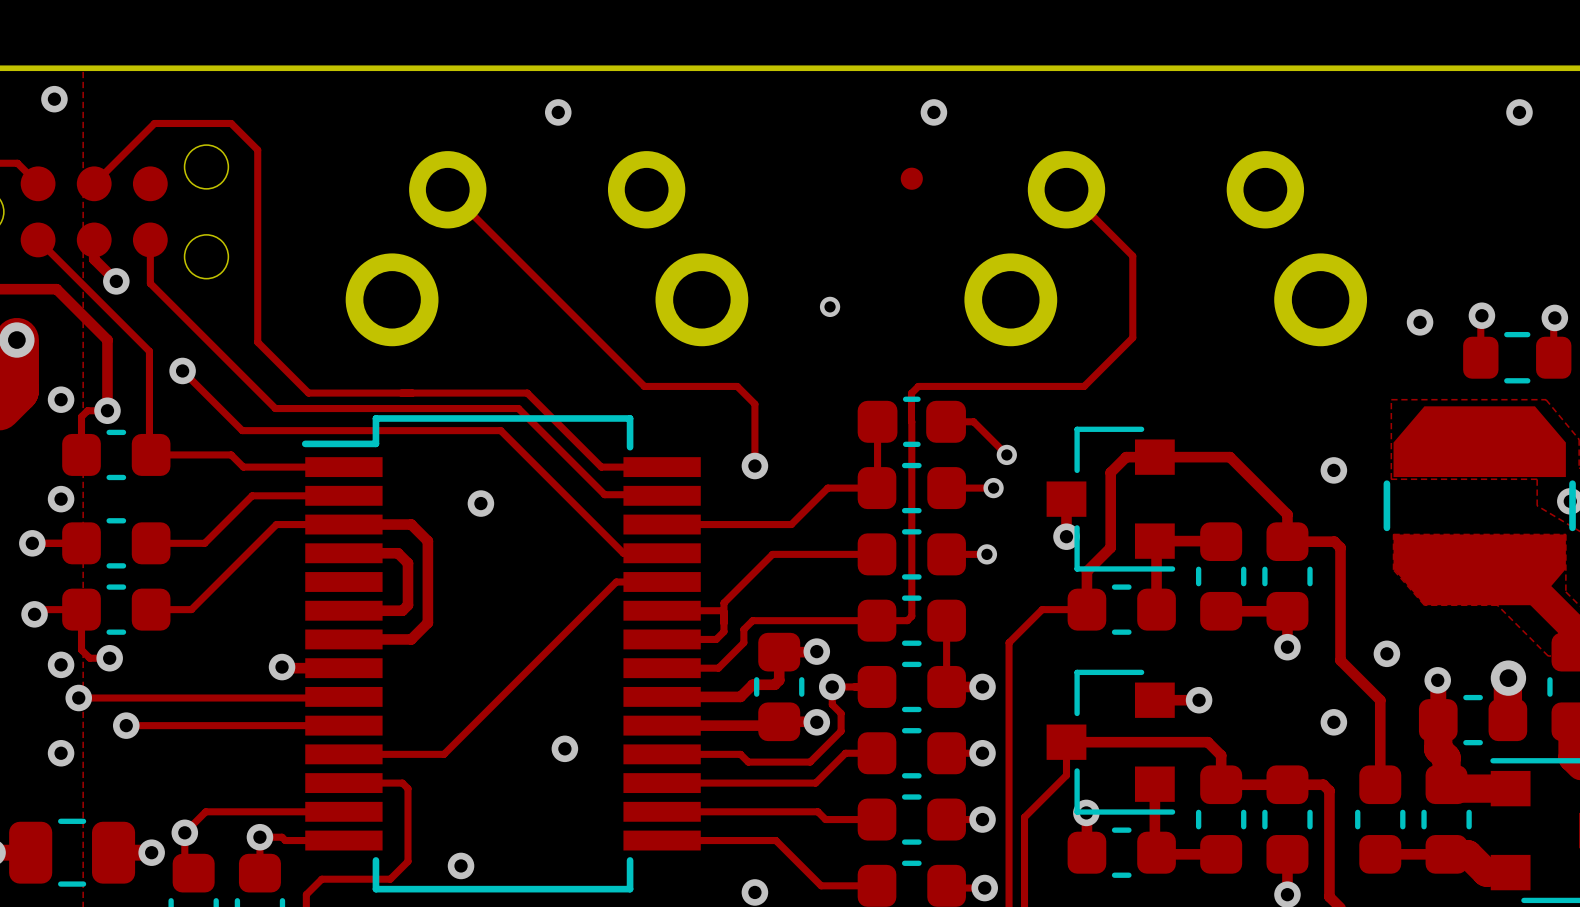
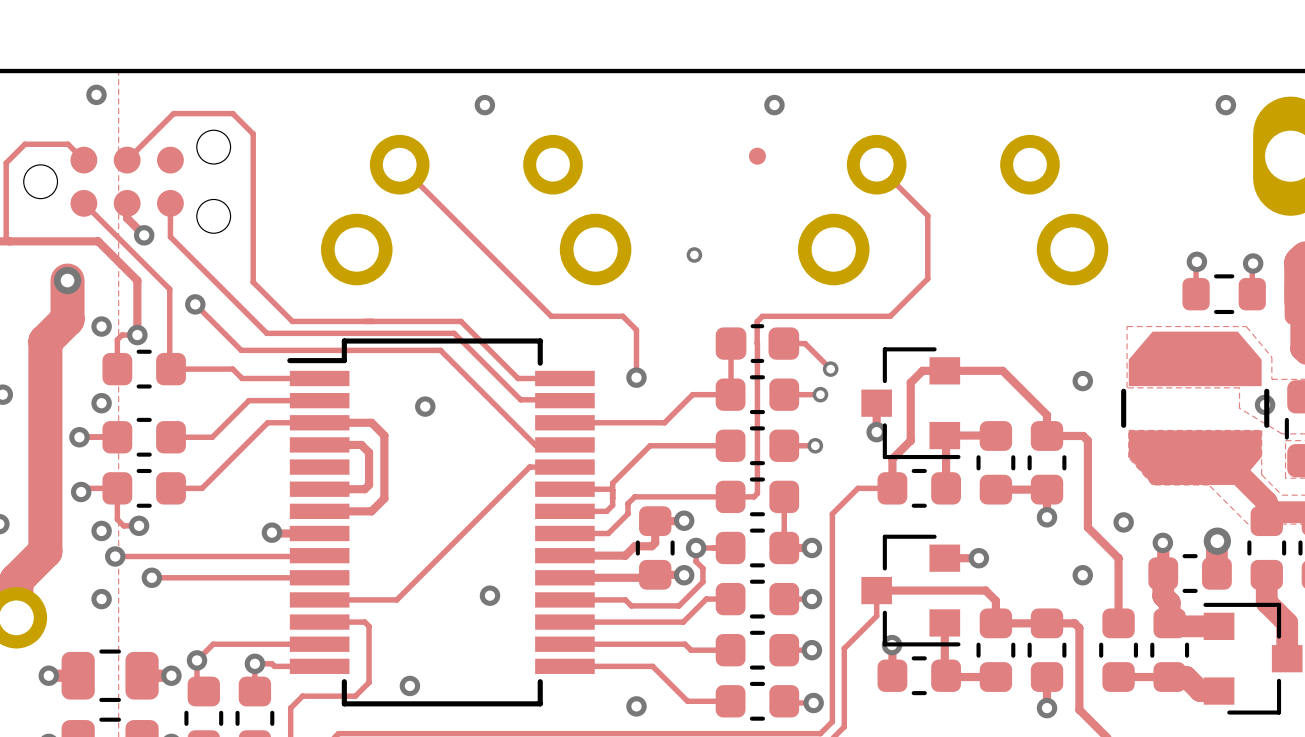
via: (1420, 322) -> none

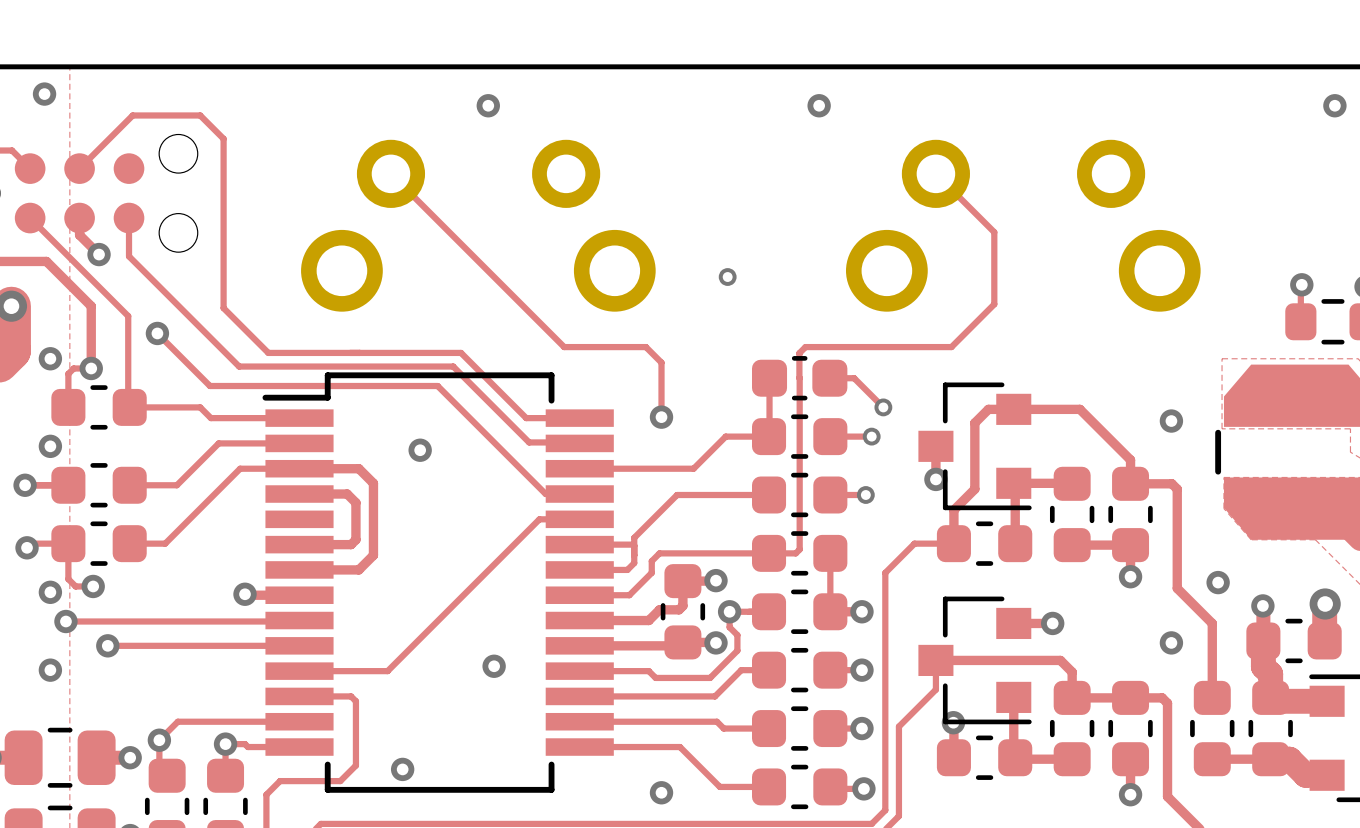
part: (757, 156) -> none

